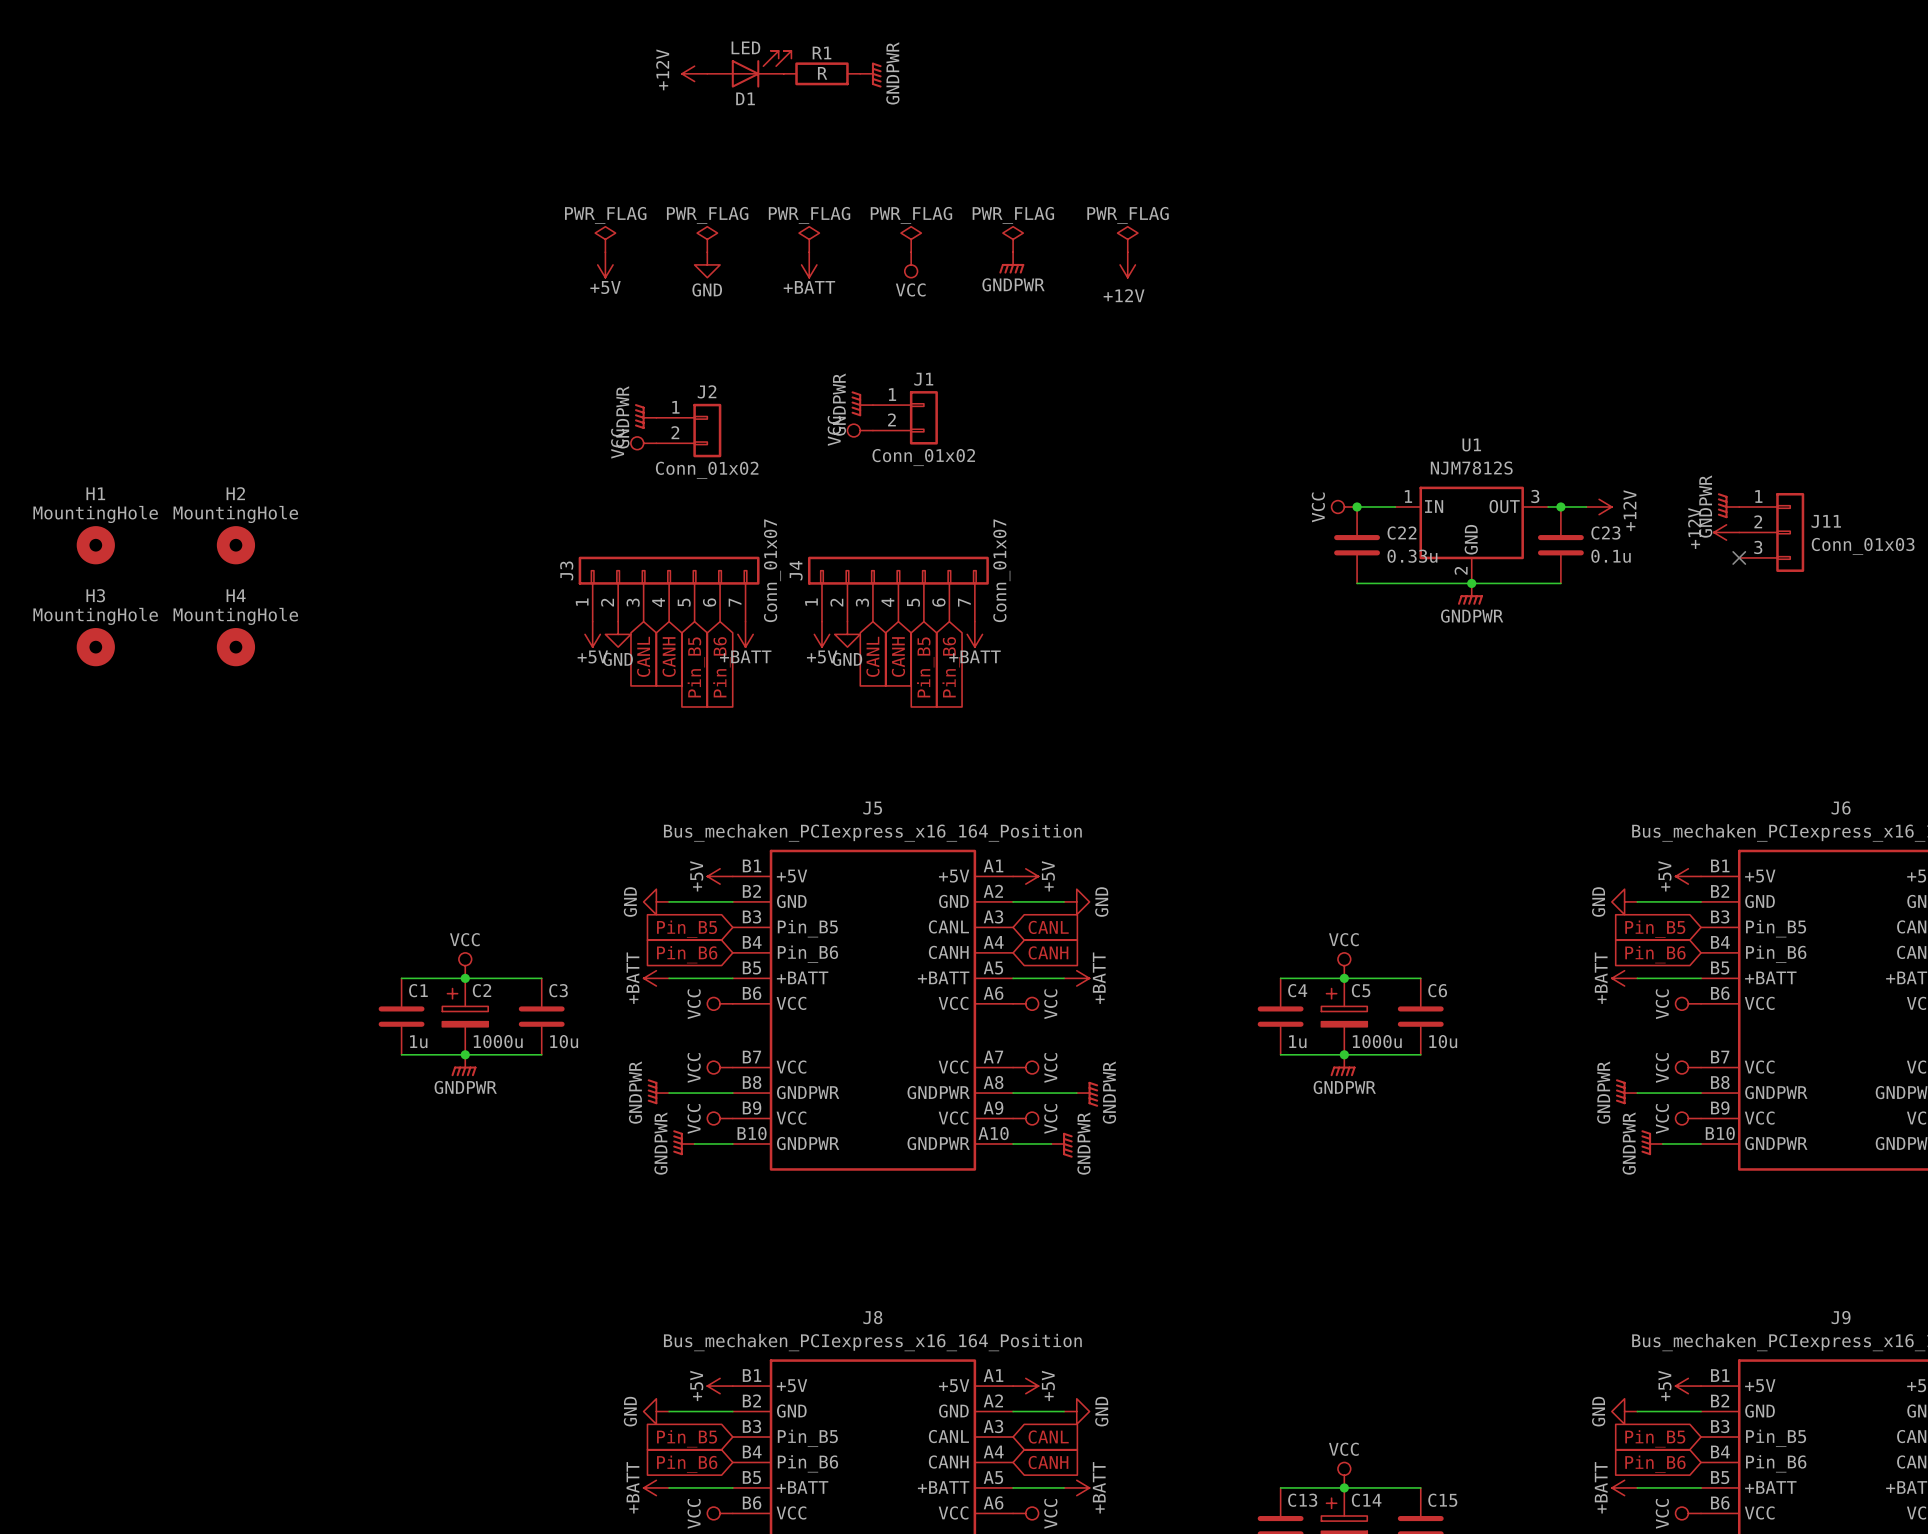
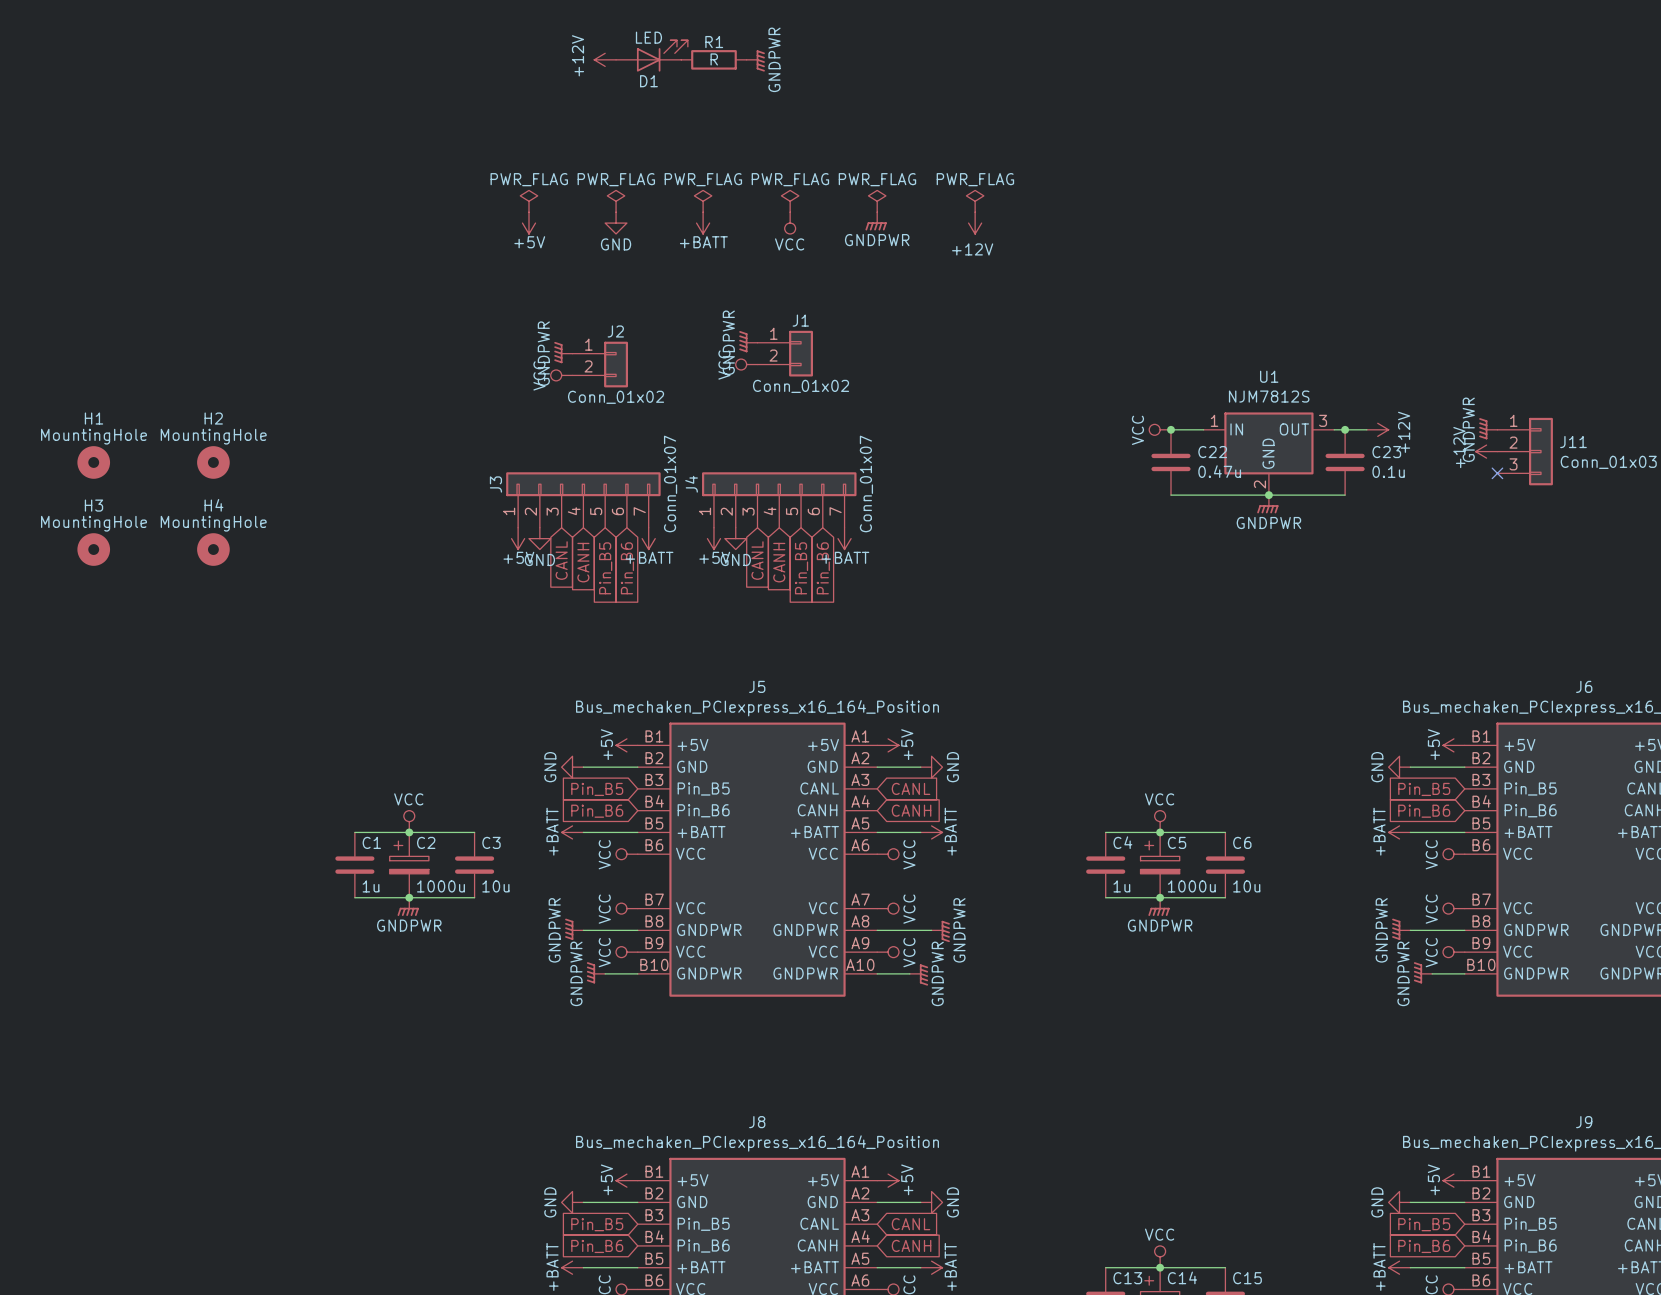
C22 value: 0.33u (1412, 556) -> 0.47u (1219, 471)

